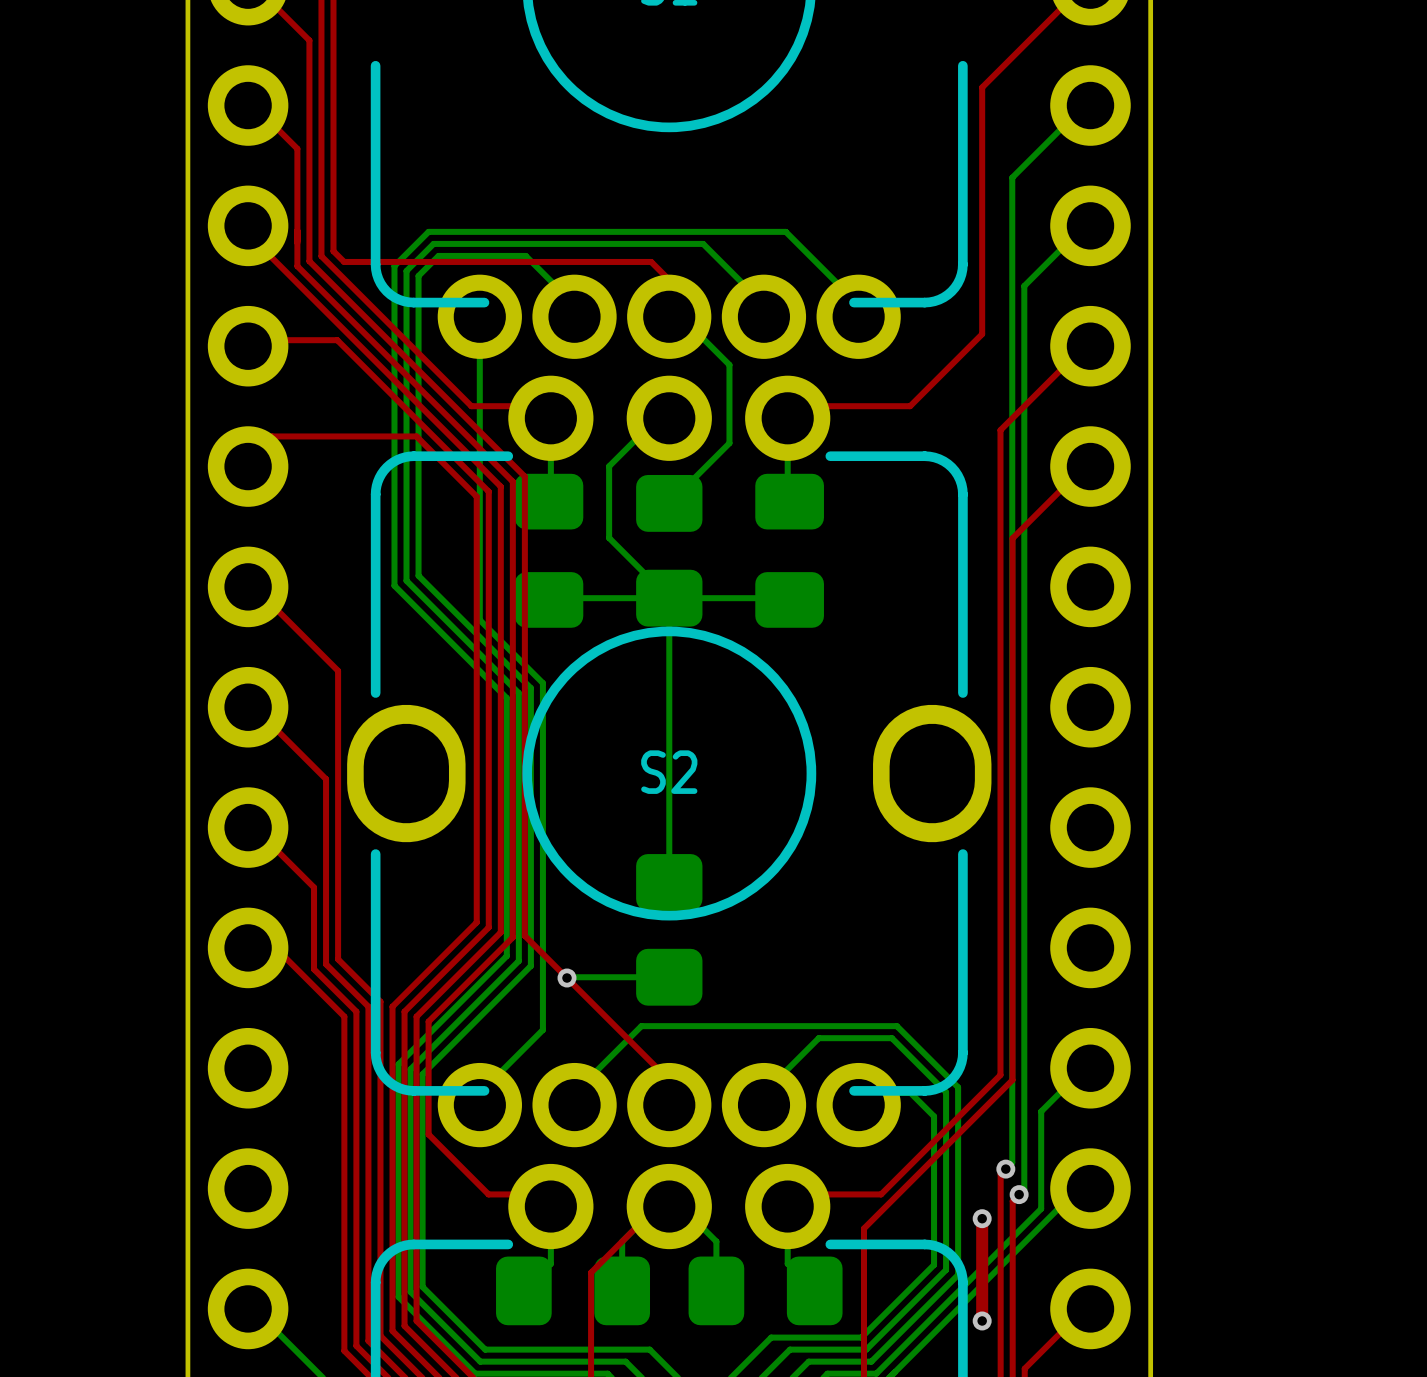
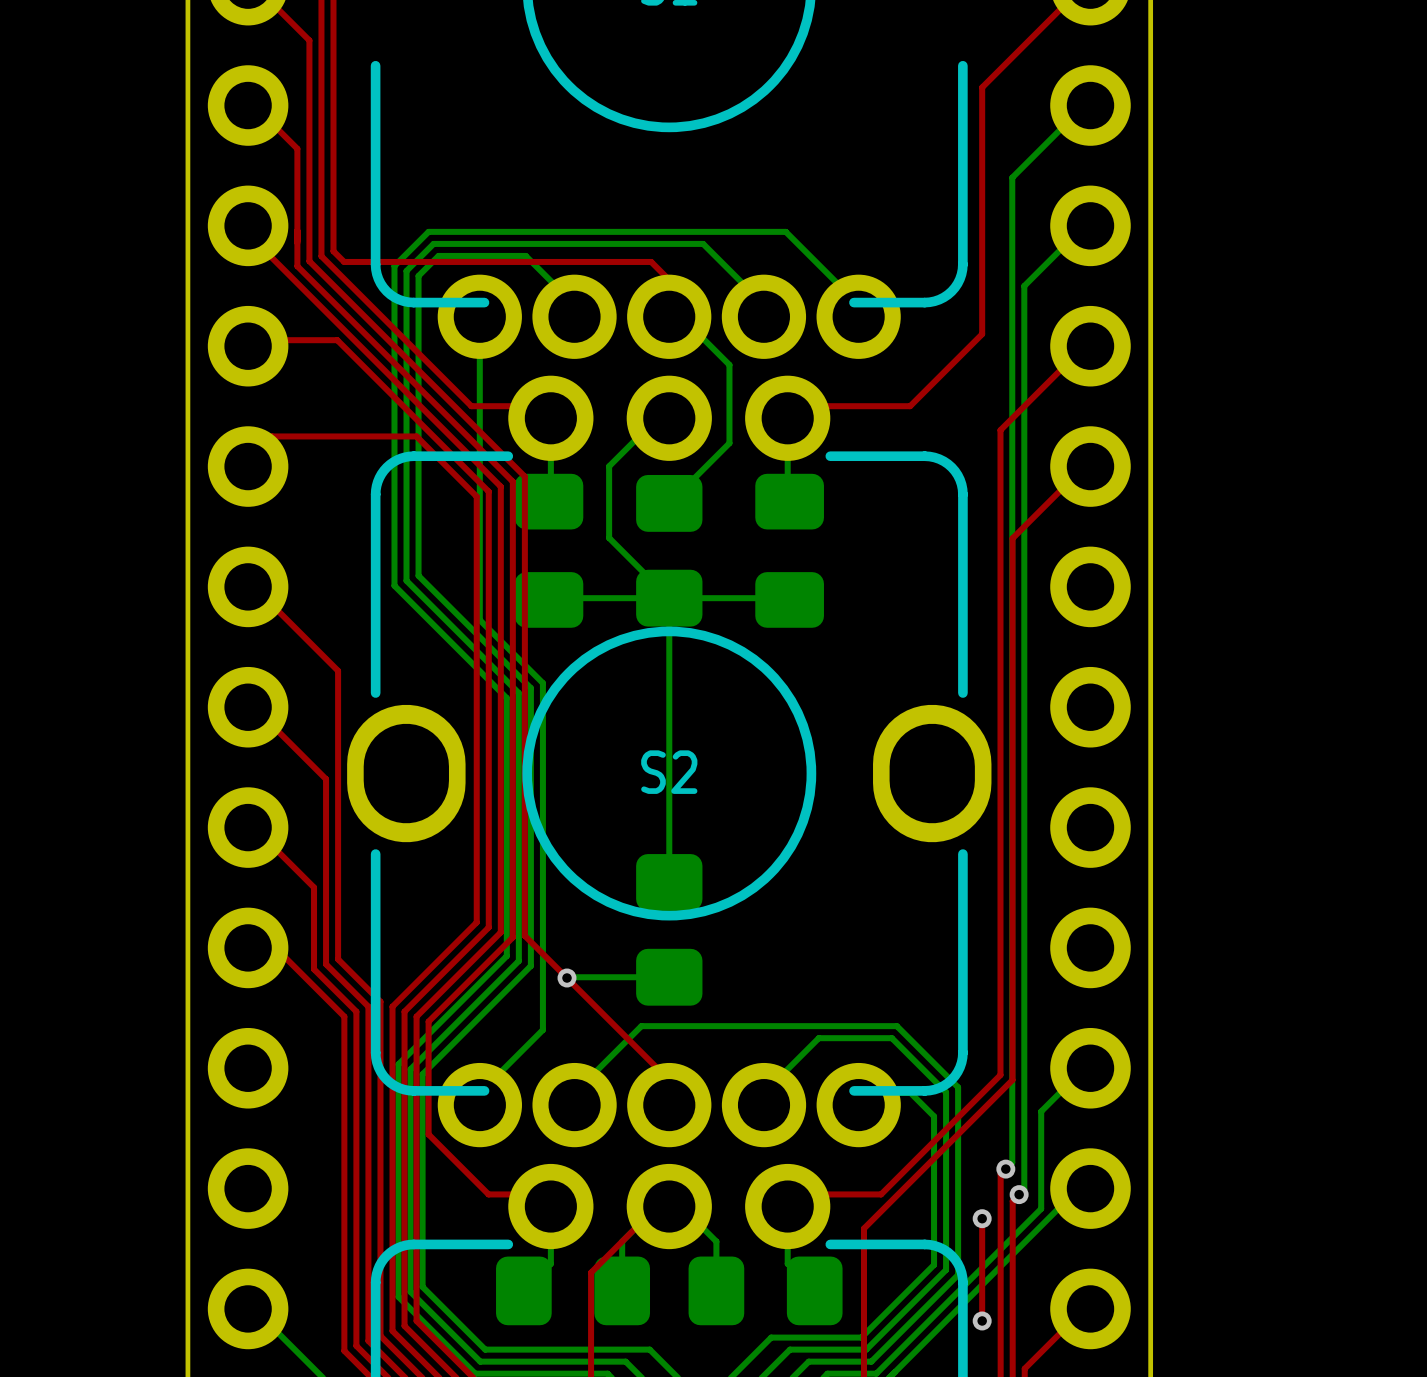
top track width: thick (982, 1218) (982, 1320) -> thin (982, 1218) (982, 1320)

